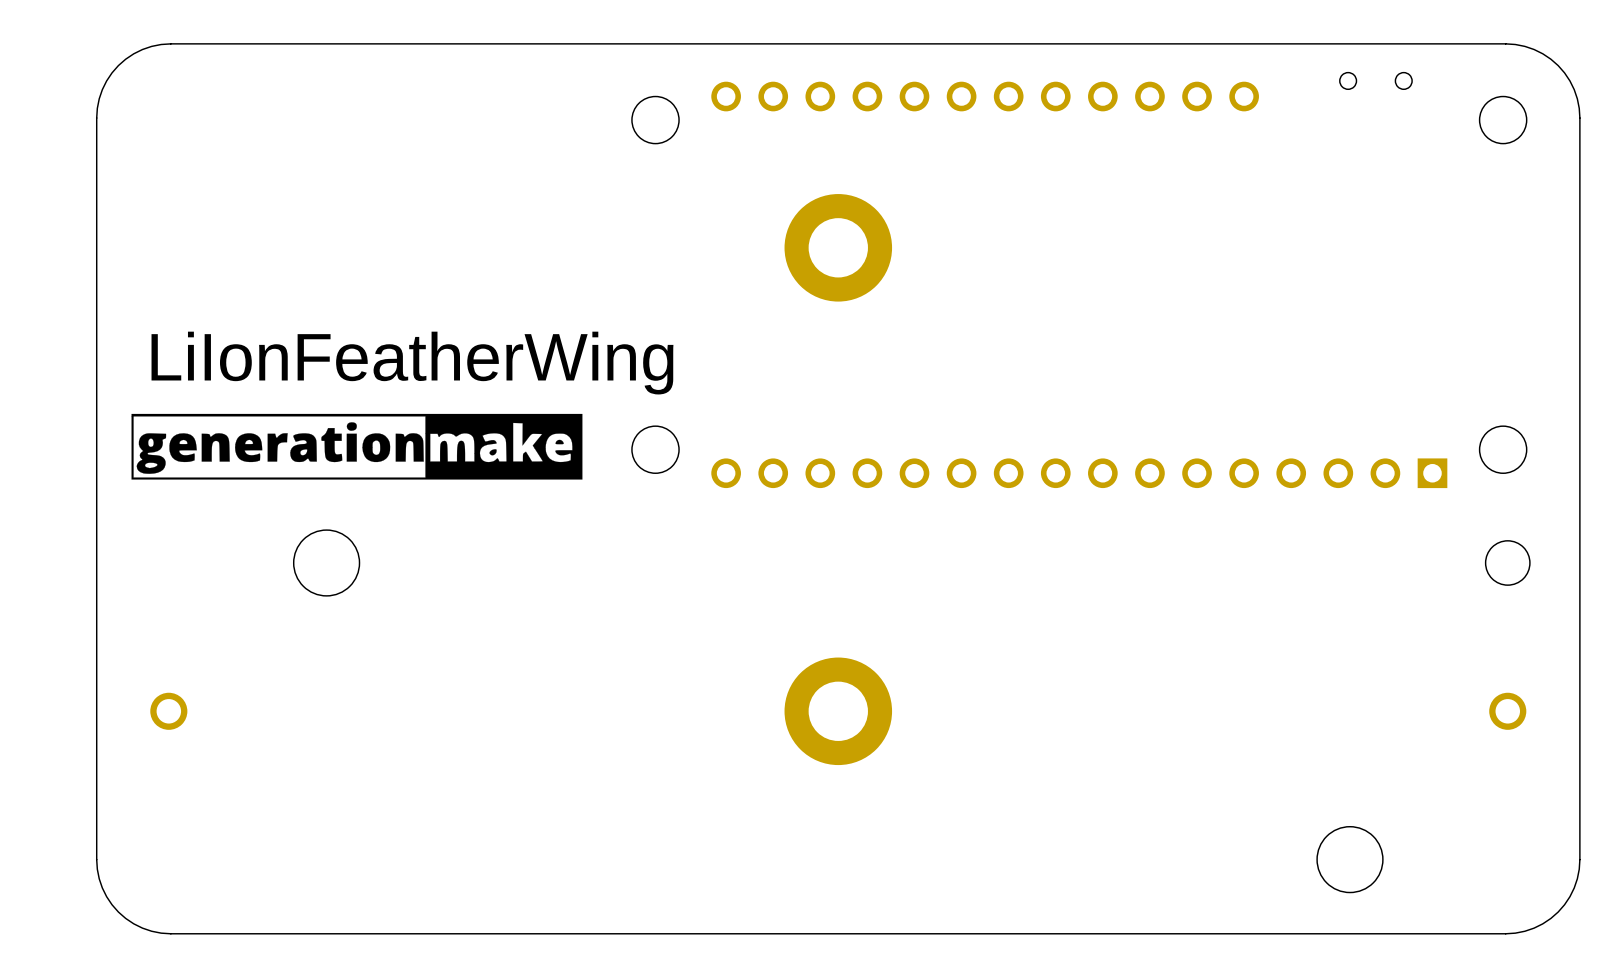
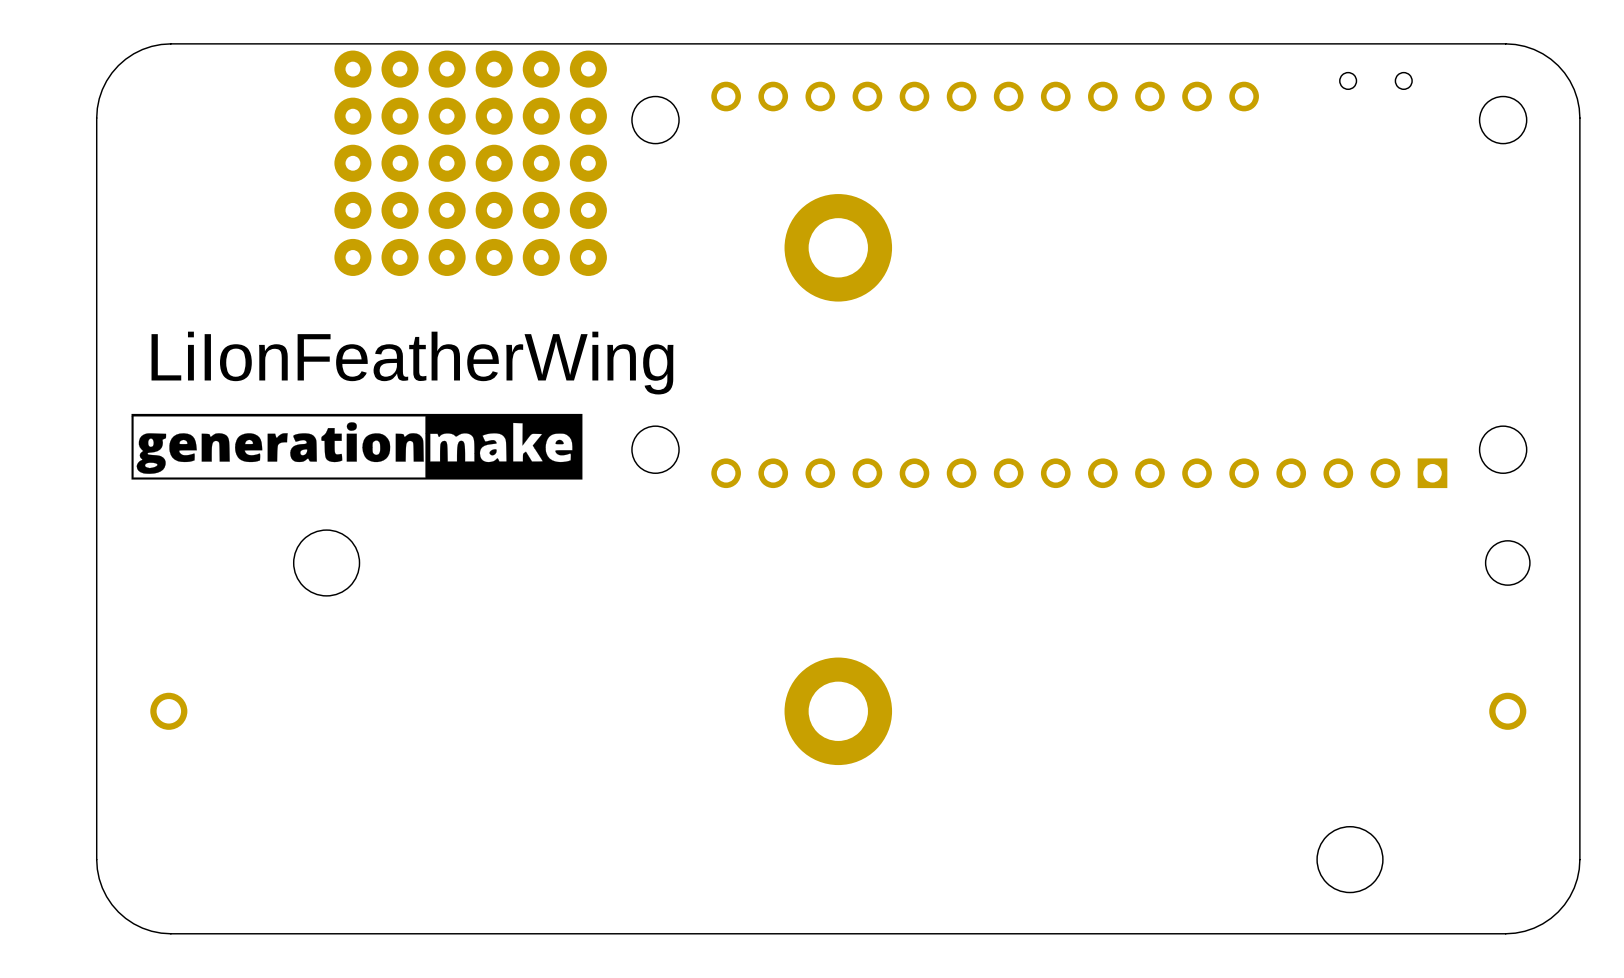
part: none -> (352, 69)
part: none -> (400, 69)
part: none -> (447, 69)
part: none -> (494, 69)
part: none -> (541, 69)
part: none -> (588, 69)
part: none -> (352, 116)
part: none -> (400, 116)
part: none -> (447, 116)
part: none -> (494, 116)
part: none -> (541, 116)
part: none -> (588, 116)
part: none -> (352, 163)
part: none -> (400, 163)
part: none -> (447, 163)
part: none -> (494, 163)
part: none -> (541, 163)
part: none -> (588, 163)
part: none -> (352, 210)
part: none -> (400, 210)
part: none -> (447, 210)
part: none -> (494, 210)
part: none -> (541, 210)
part: none -> (588, 210)
part: none -> (352, 257)
part: none -> (400, 257)
part: none -> (447, 257)
part: none -> (494, 257)
part: none -> (541, 257)
part: none -> (588, 257)

